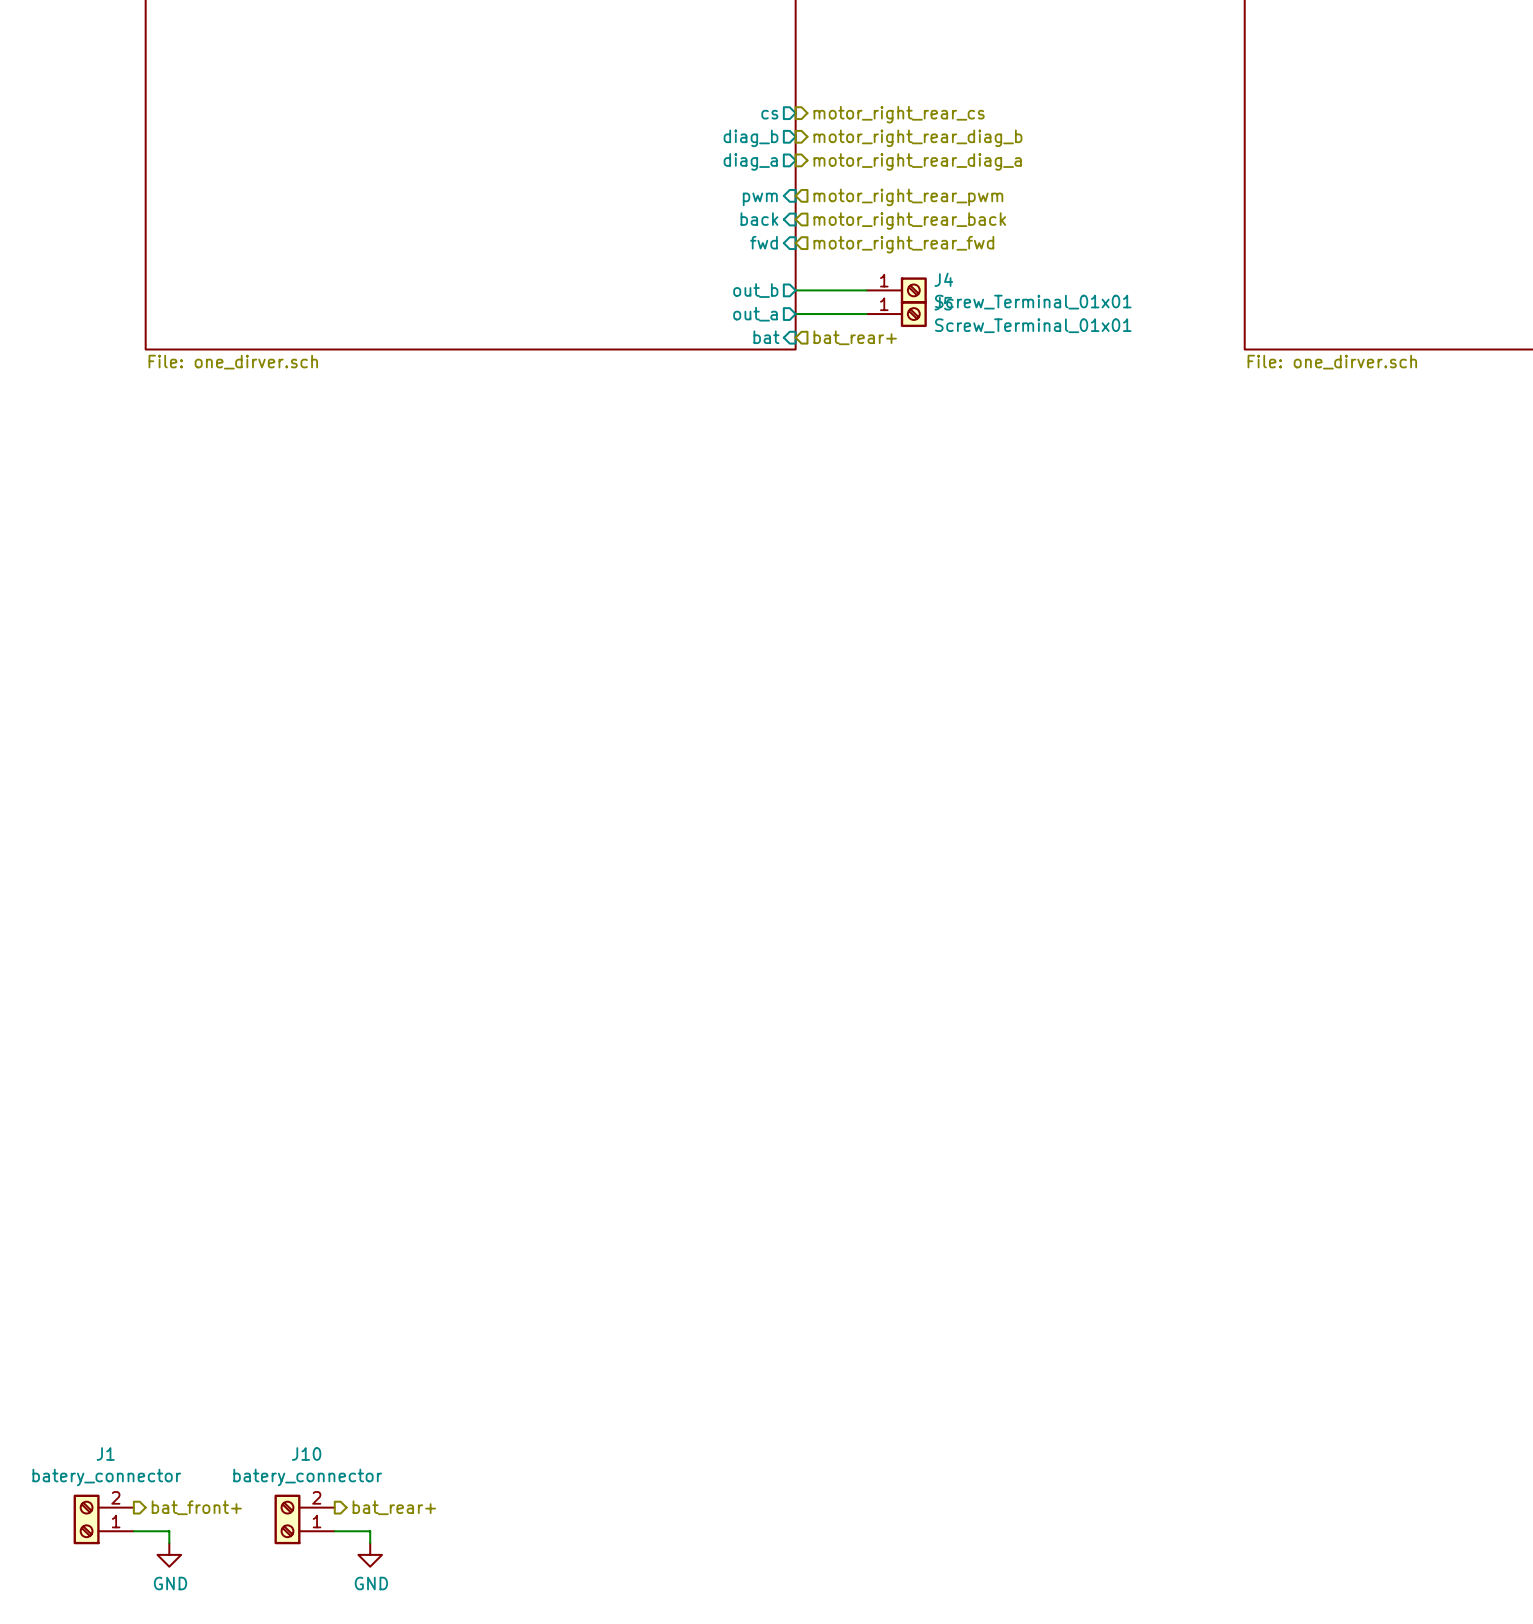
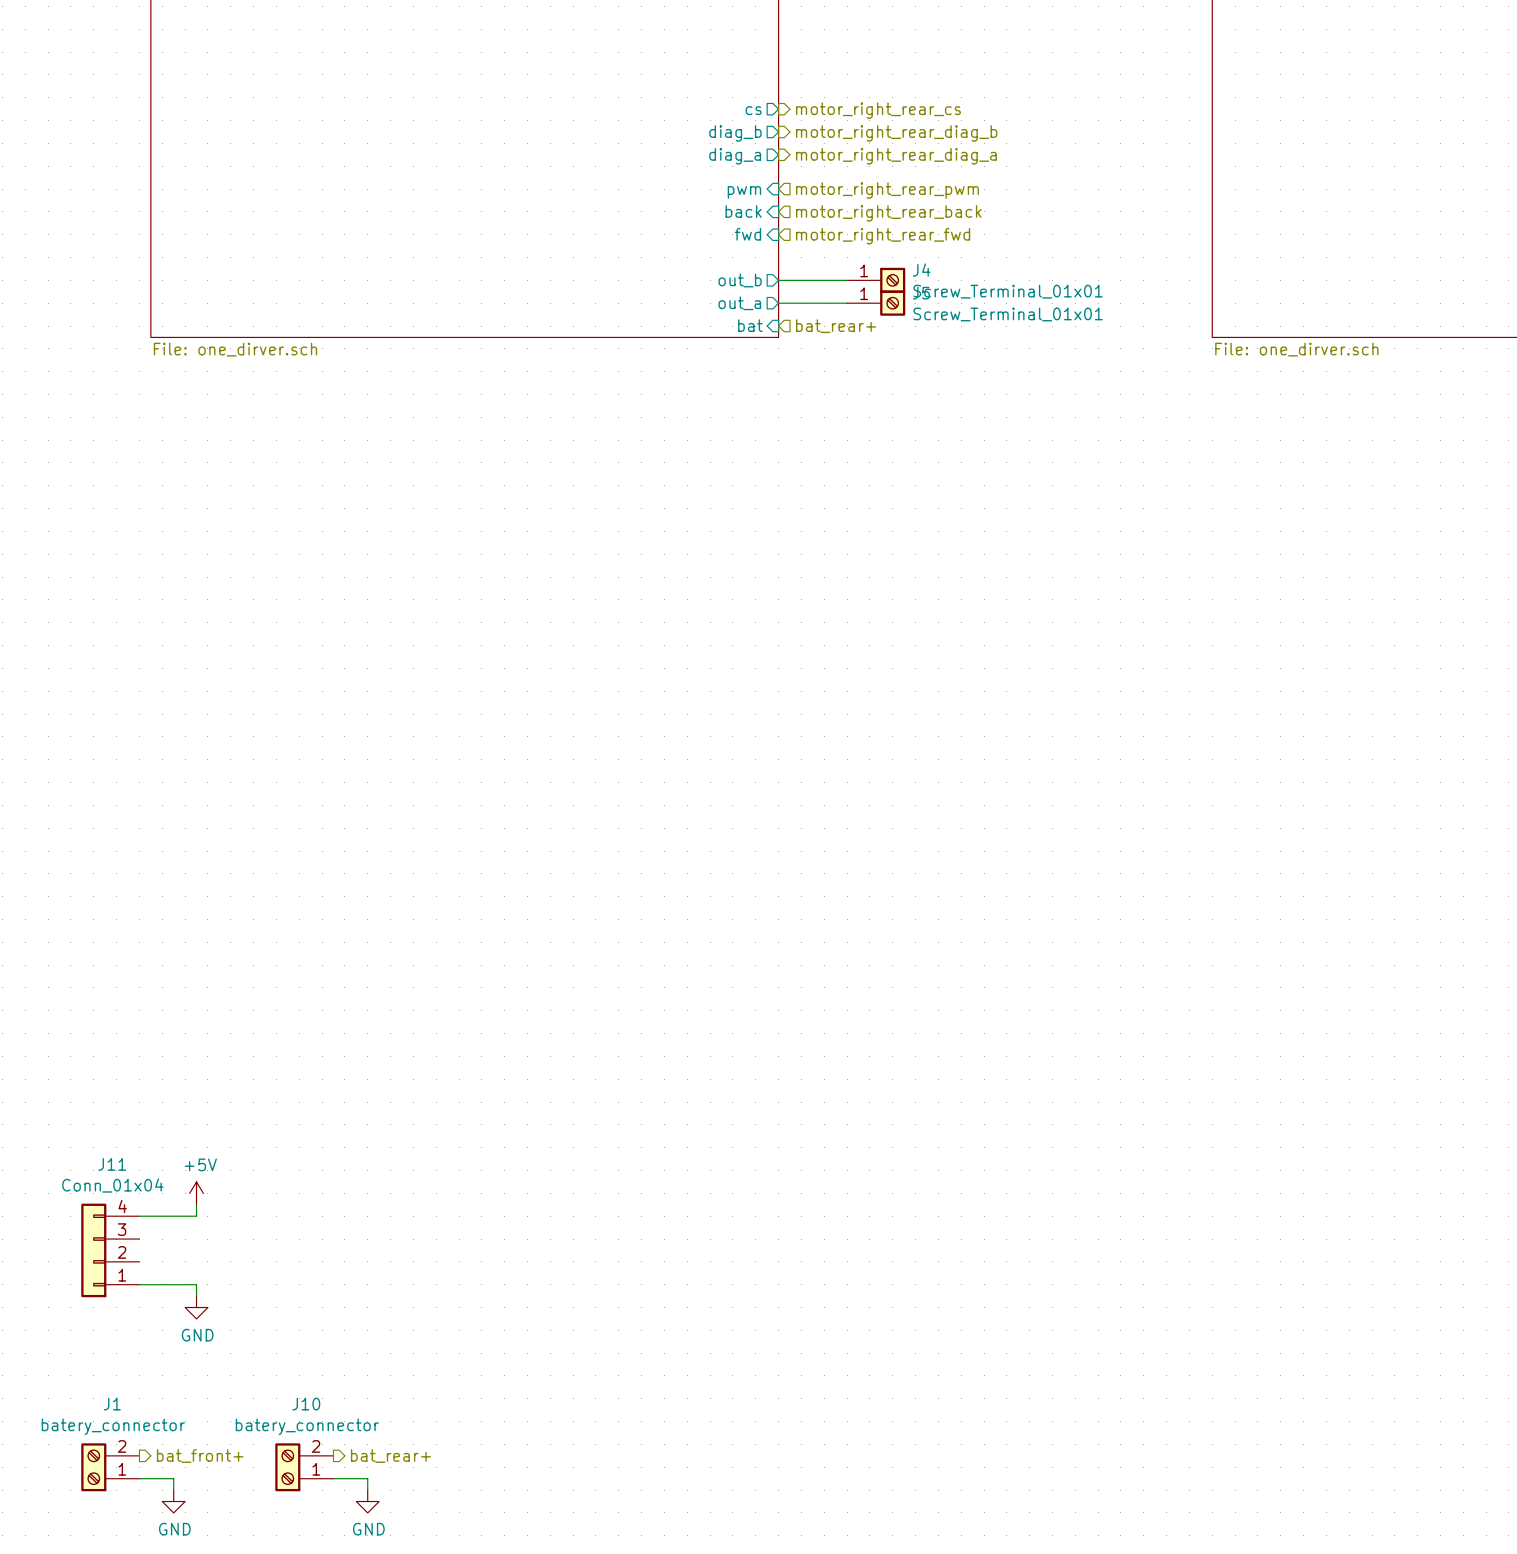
power symbol: none -> +5V (196, 1193)
wire: none -> (196, 1204) (196, 1216) (139, 1216)
J11: none -> Conn_01x04 (110, 1250)
wire: none -> (139, 1284) (196, 1284) (196, 1296)
power symbol: none -> GND (196, 1307)

